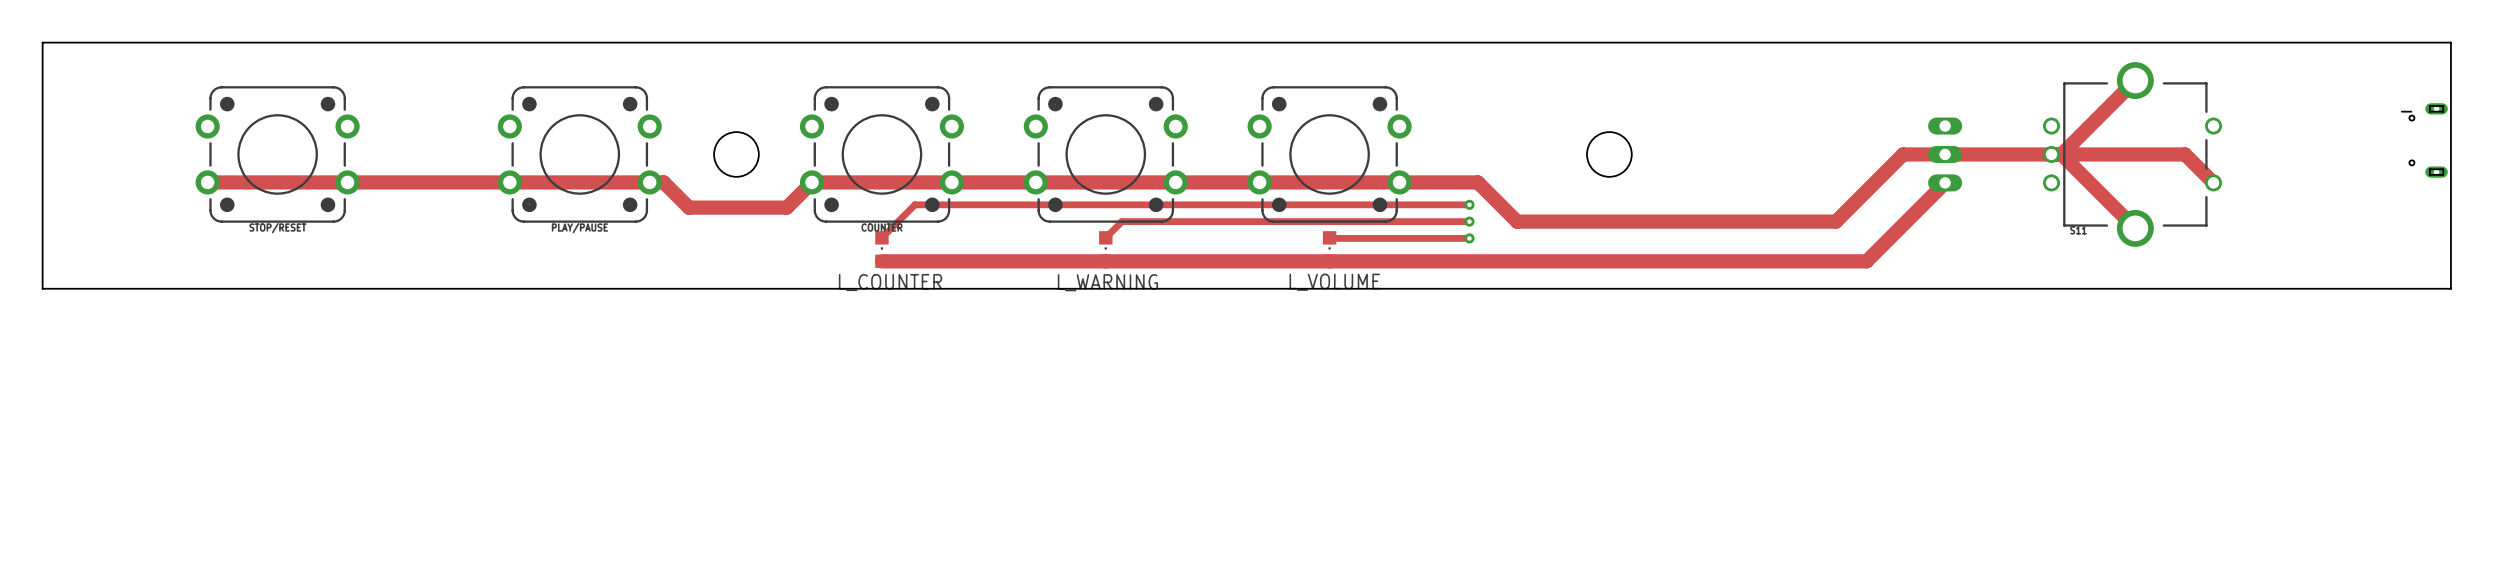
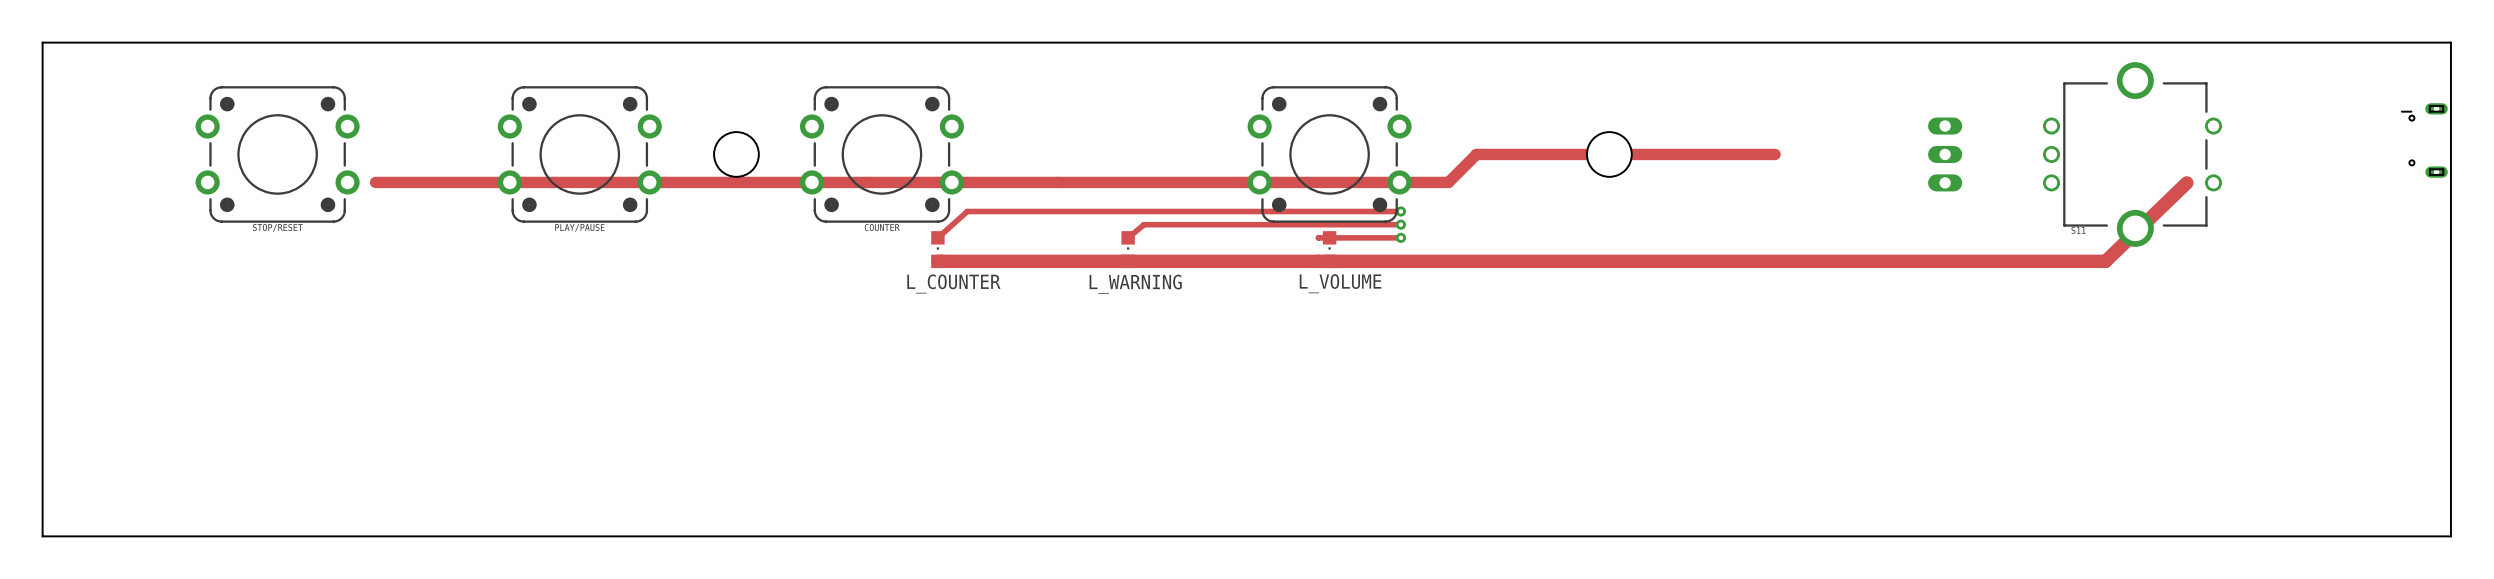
track: (2135, 80) (2061, 154) (2135, 228) -> none
part: (1105, 154) -> none
track: (207, 182) (375, 182) -> none
track width: thick (375, 182) (663, 182) -> thin (375, 182) (663, 182)
track: (663, 182) (688, 207) (786, 207) (812, 182) -> (663, 182) (812, 182) (663, 182)
track width: thick (812, 182) (1448, 182) -> thin (812, 182) (1448, 182)
track: (1448, 182) (1477, 182) (1517, 221) (1836, 221) (1903, 154) (2185, 154) (2213, 182) -> (1448, 182) (1476, 154) (1775, 154)
track: (1945, 182) (1866, 261) -> (2186, 182) (2105, 261) (1866, 261)
track: (1469, 204) (914, 204) (881, 237) -> none
via: (1469, 204) -> none
track: none -> (1400, 211) (967, 211) (937, 237)
via: none -> (1400, 211)
track: (1469, 221) (1122, 221) (1105, 237) -> none
via: (1469, 221) -> none
track: none -> (1400, 224) (1144, 224) (1128, 237)
via: none -> (1400, 224)
track: none -> (1318, 237) (1400, 237)
track: (1329, 237) (1469, 238) -> none
via: none -> (1400, 237)
via: (1469, 238) -> none
L_COUNTER position: (881, 249) -> (937, 249)
L_WARNING position: (1105, 249) -> (1128, 249)
track: (881, 261) (937, 261) -> none
track width: thick (937, 261) (1866, 261) -> thin (937, 261) (1866, 261)
board edge: (42, 288) (2450, 288) -> (42, 288) (42, 536) (2450, 536) (2450, 288)

